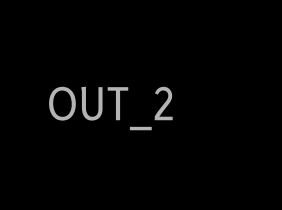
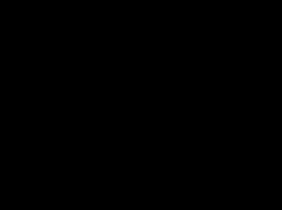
label: OUT_2 (110, 108) -> none

